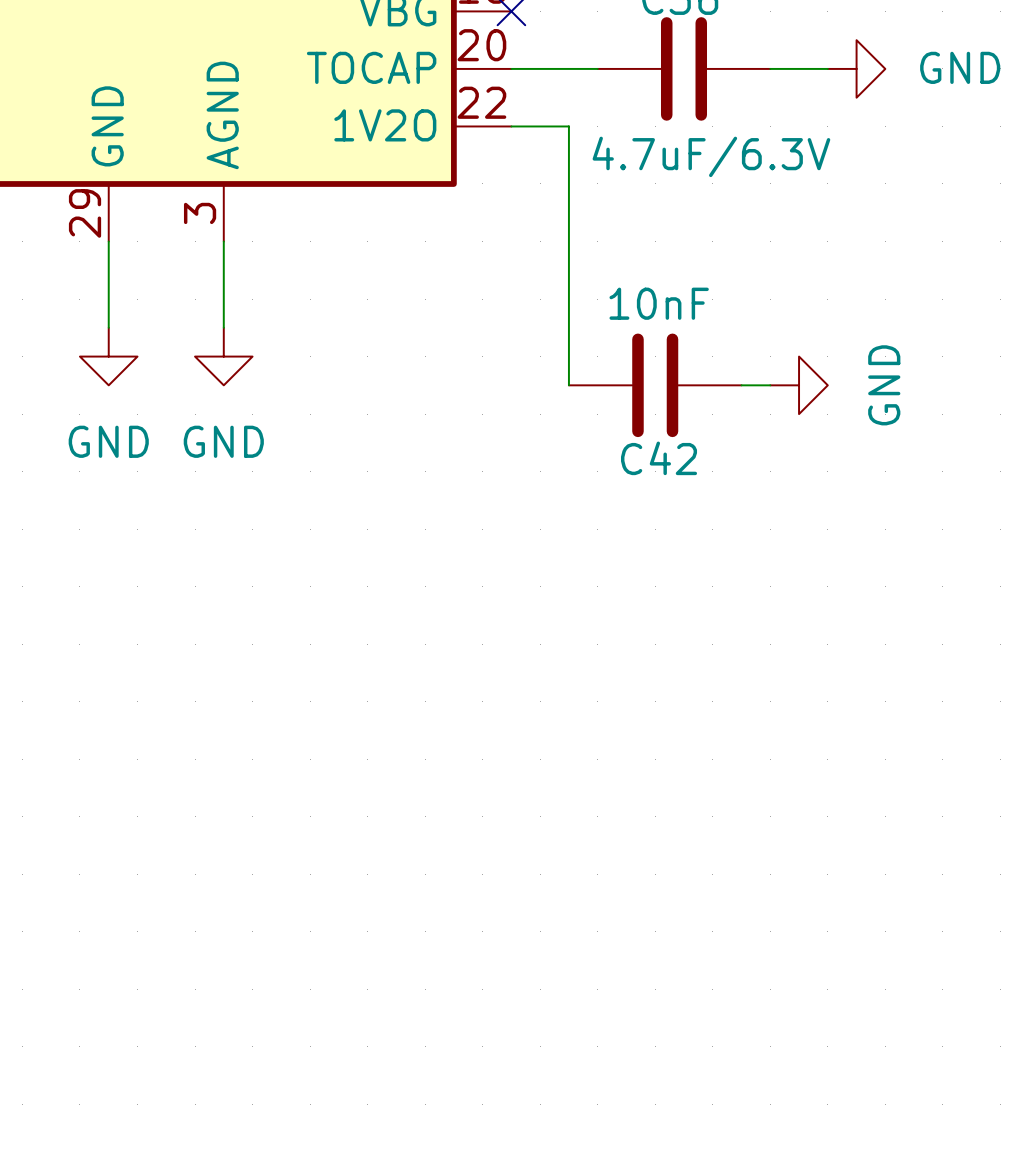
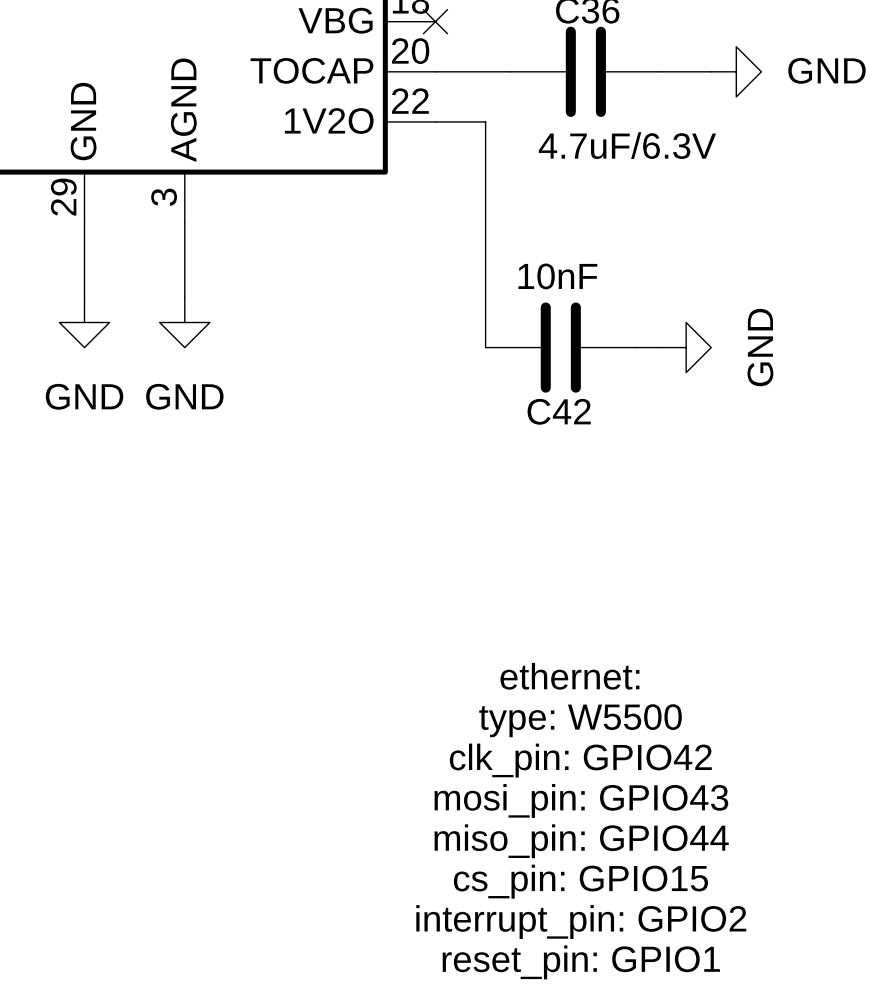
text: none -> ethernet: (569, 676)
text: none -> type: W5500 (580, 720)
text: none -> clk_pin: GPIO42 (580, 760)
text: none -> mosi_pin: GPIO43 (581, 800)
text: none -> miso_pin: GPIO44 (581, 841)
text: none -> cs_pin: GPIO15 (580, 881)
text: none -> interrupt_pin: GPIO2 (581, 922)
text: none -> reset_pin: GPIO1 (581, 962)

